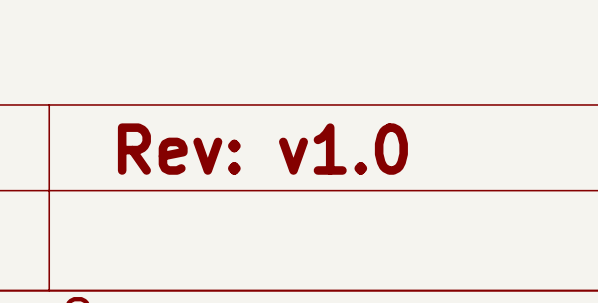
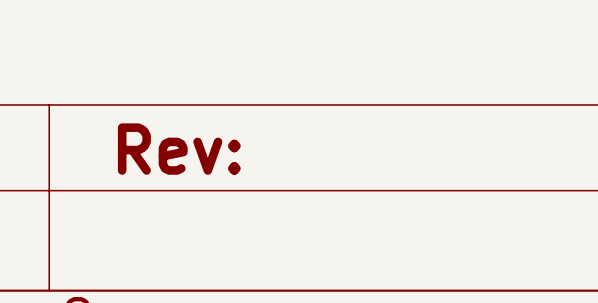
title block: Rev: v1.0 (262, 149) -> Rev: (179, 149)

